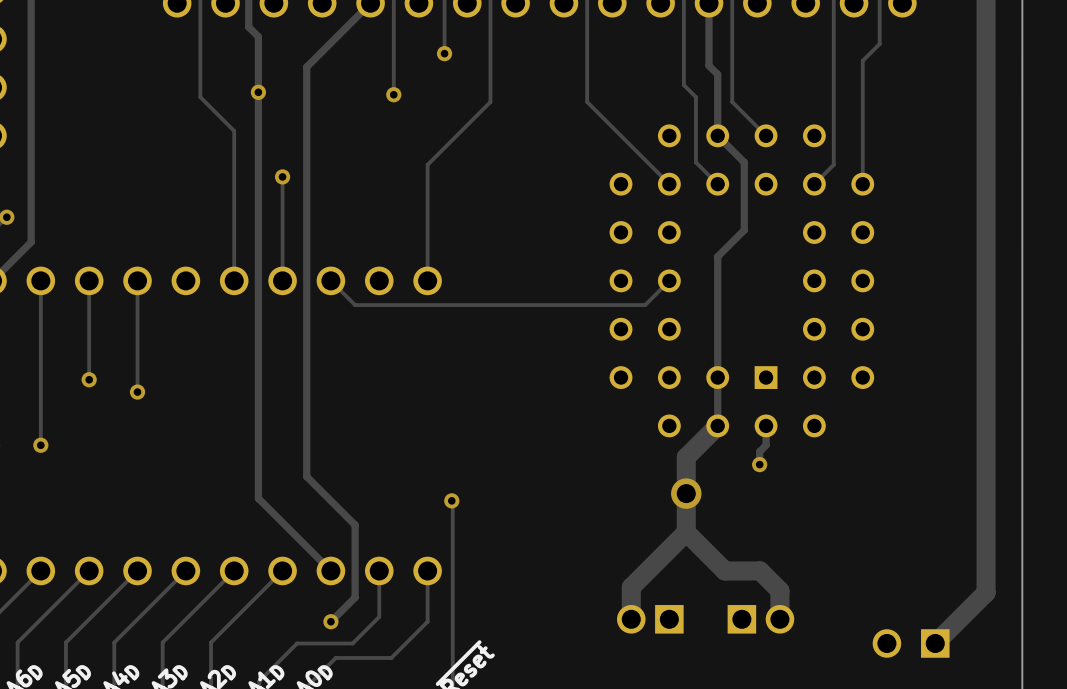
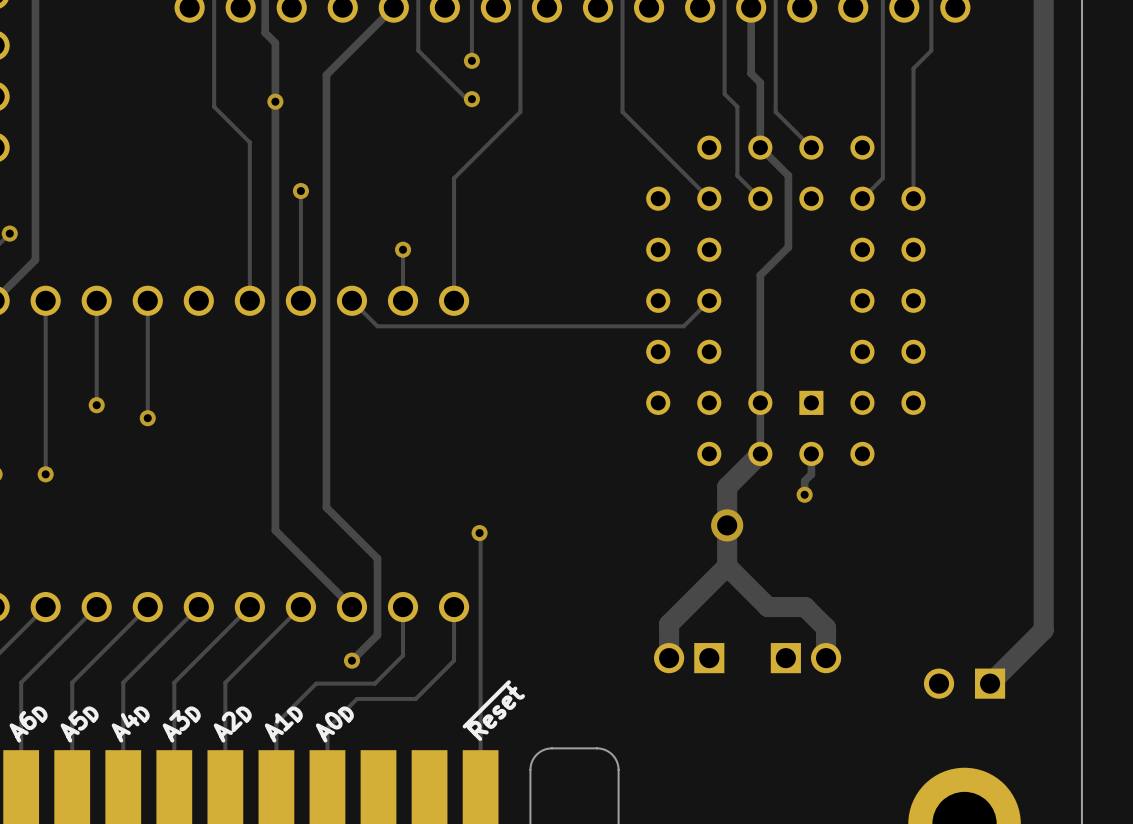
track: (393, 43) (393, 94) -> (418, 50) (466, 99) (471, 99)
via position: (393, 94) -> (471, 99)
track: none -> (403, 249) (403, 300)
via: none -> (403, 249)

